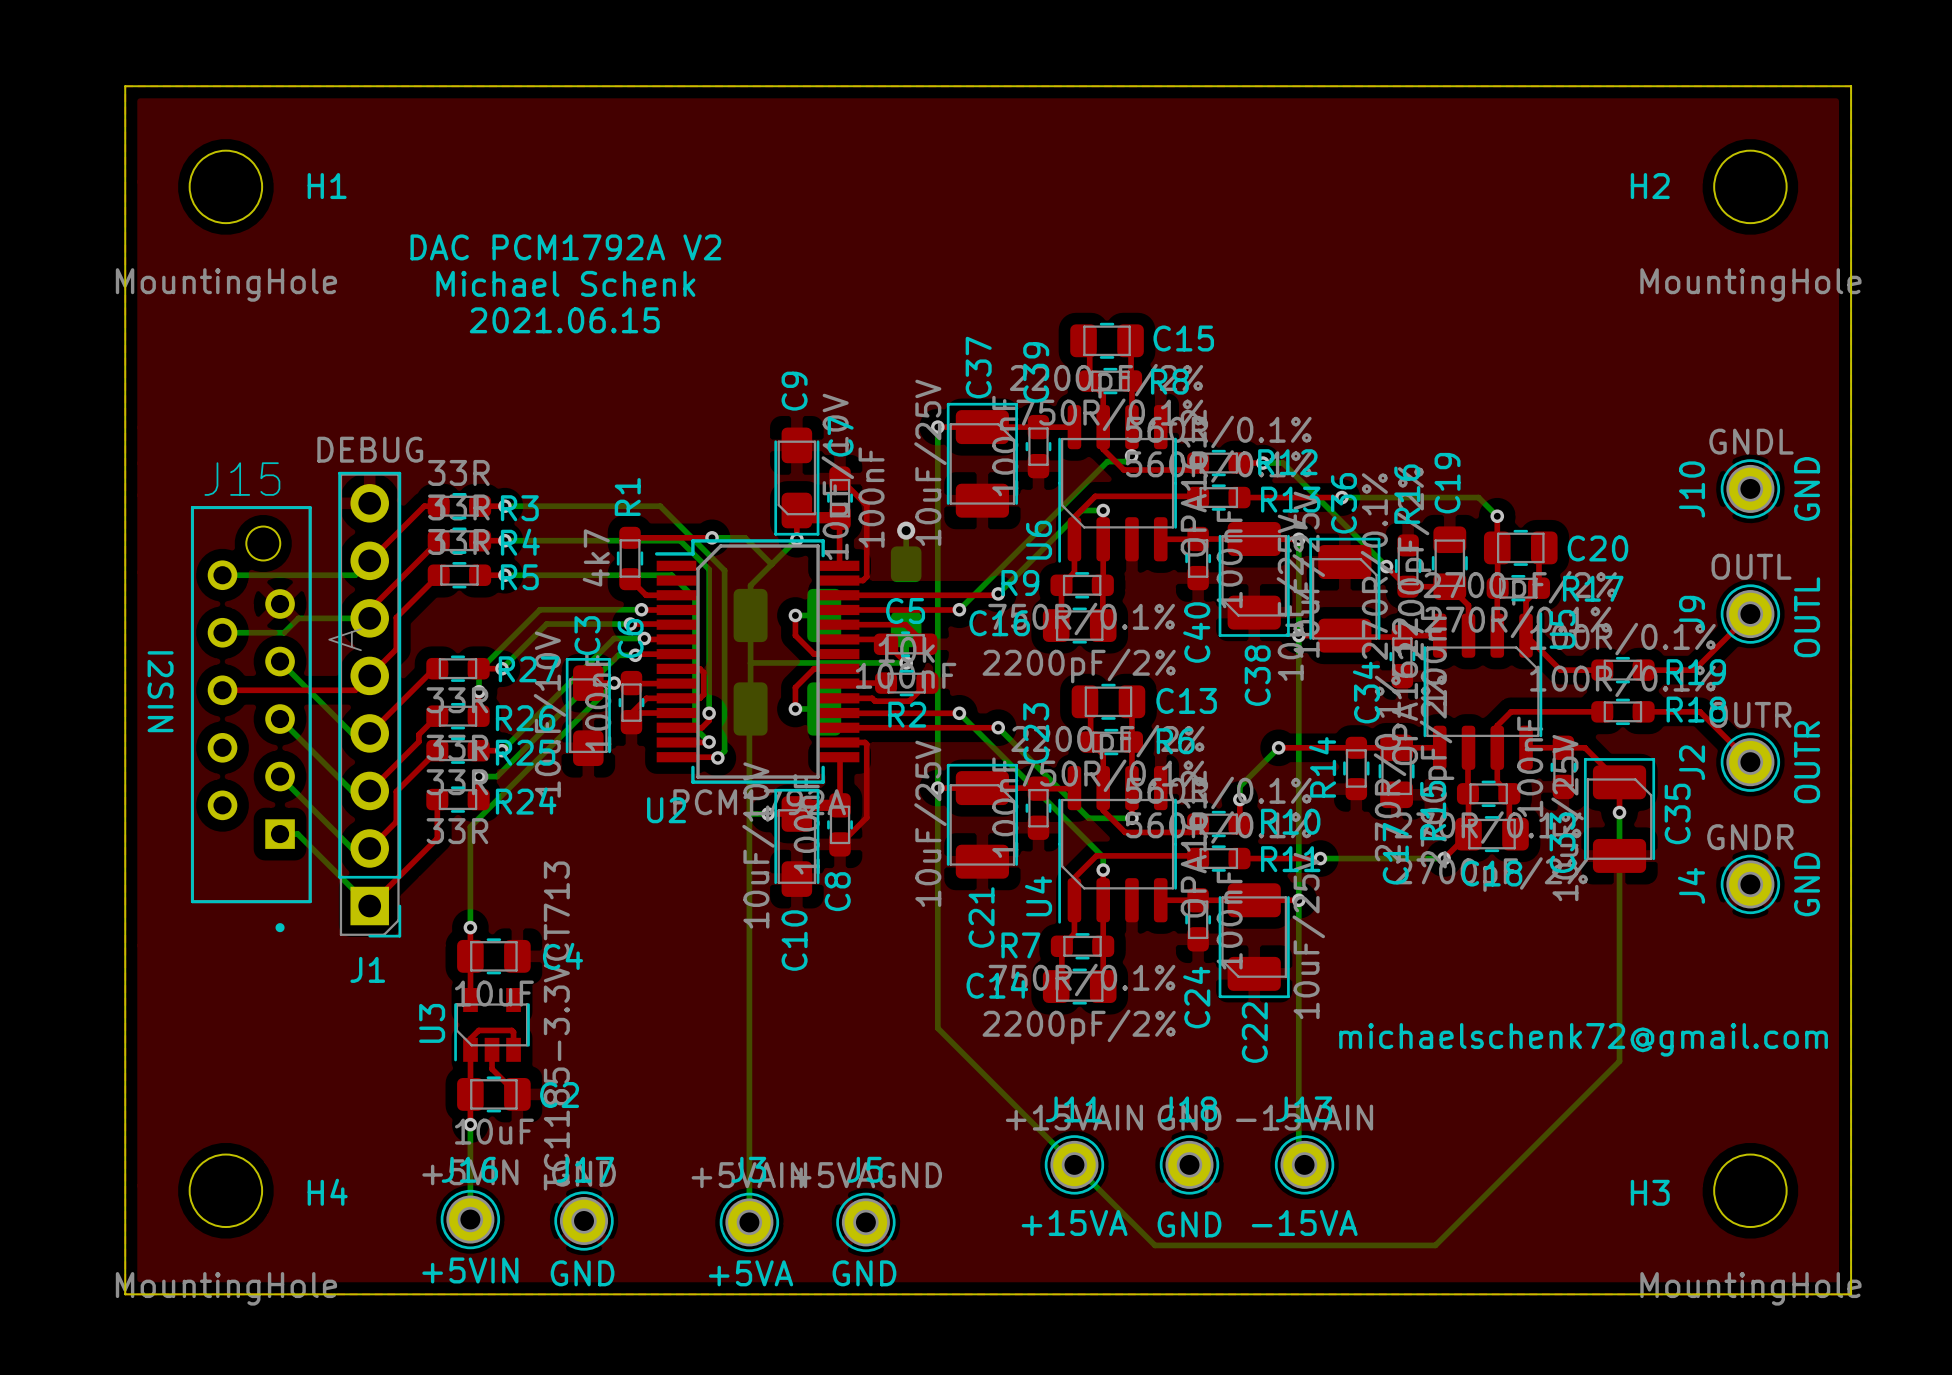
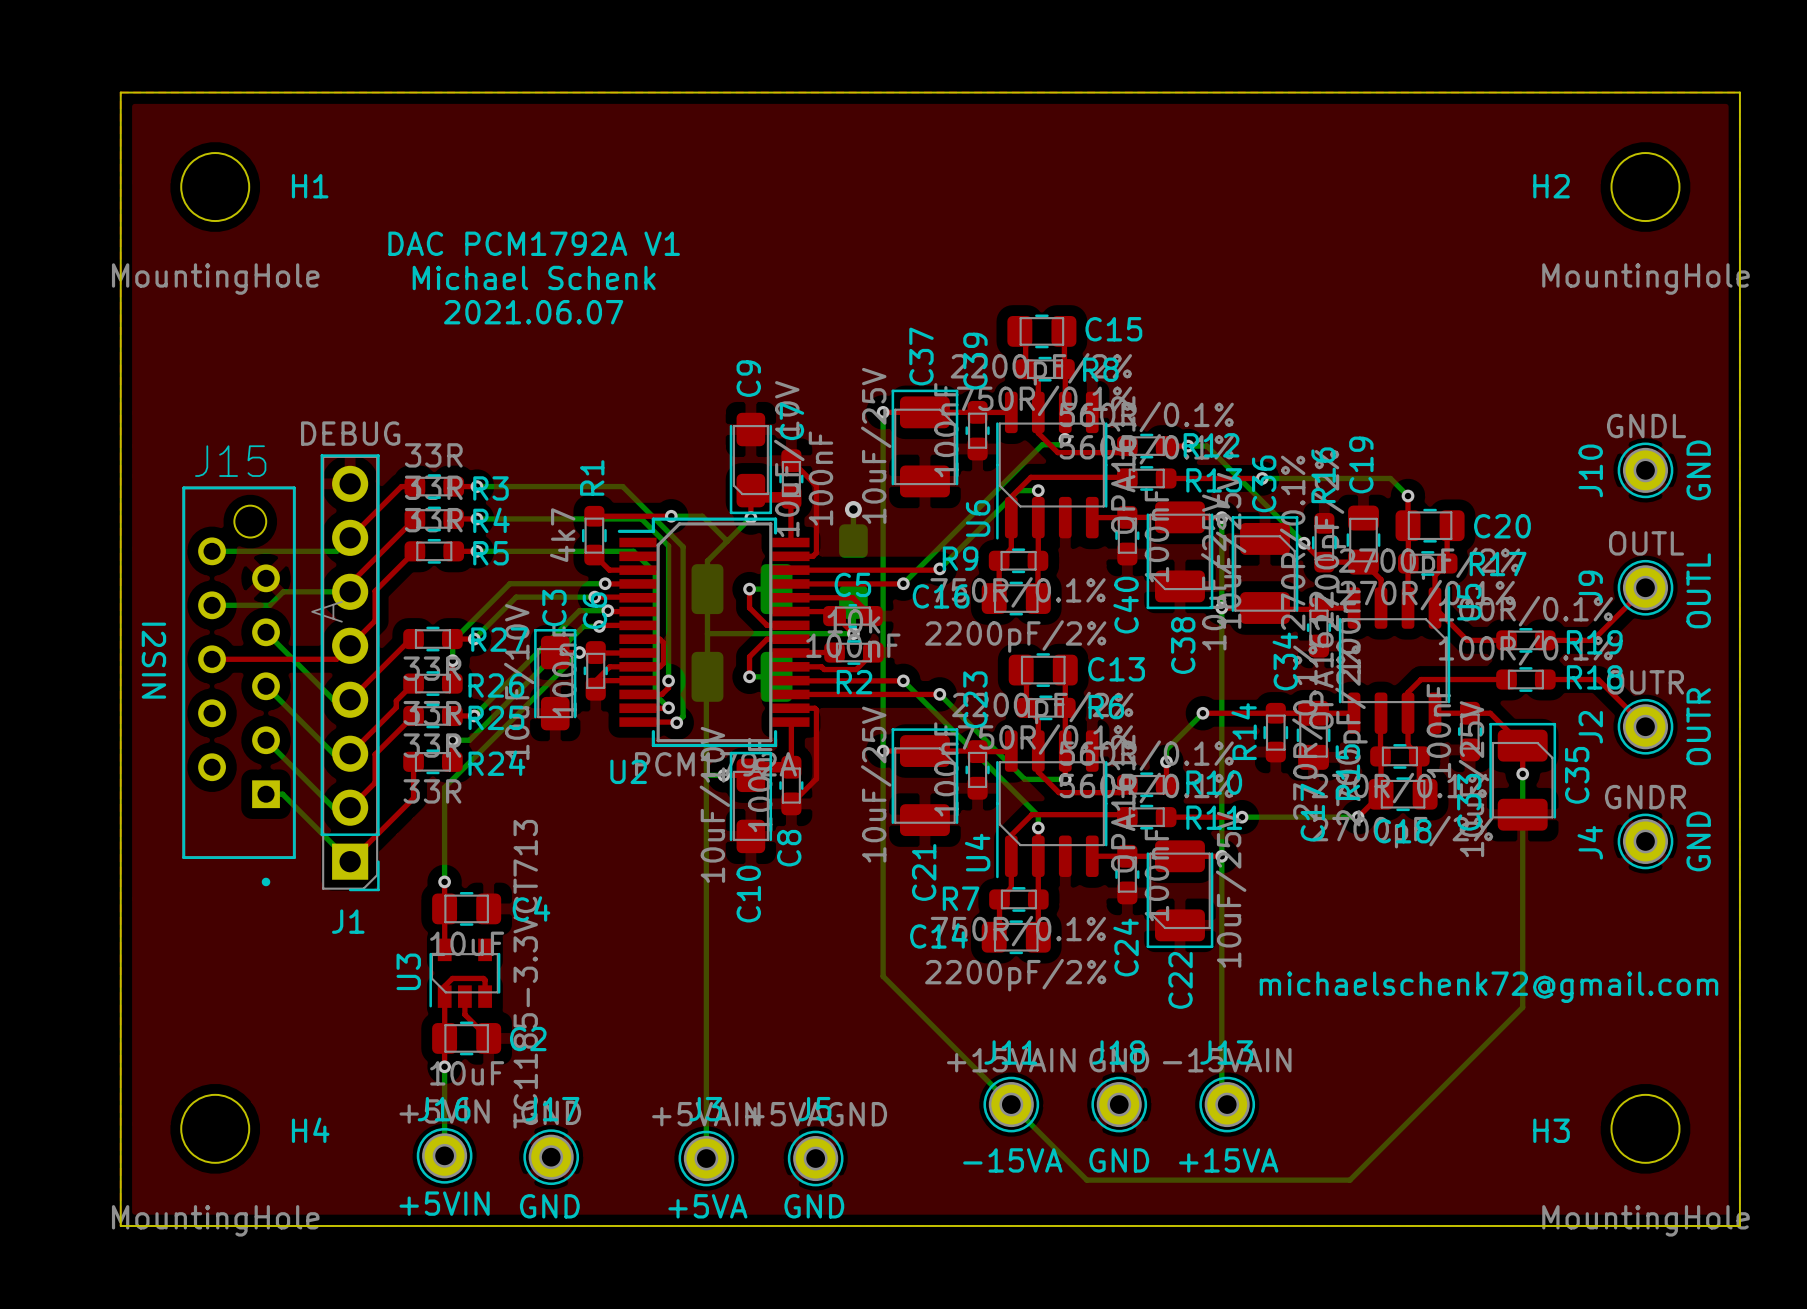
text: DAC PCM1792A V2 (565, 247) -> DAC PCM1792A V1 (534, 243)
text: 2021.06.15 (564, 320) -> 2021.06.07 (533, 312)
text: +15VA (1074, 1223) -> -15VA (1012, 1160)
text: -15VA (1304, 1223) -> +15VA (1228, 1160)

